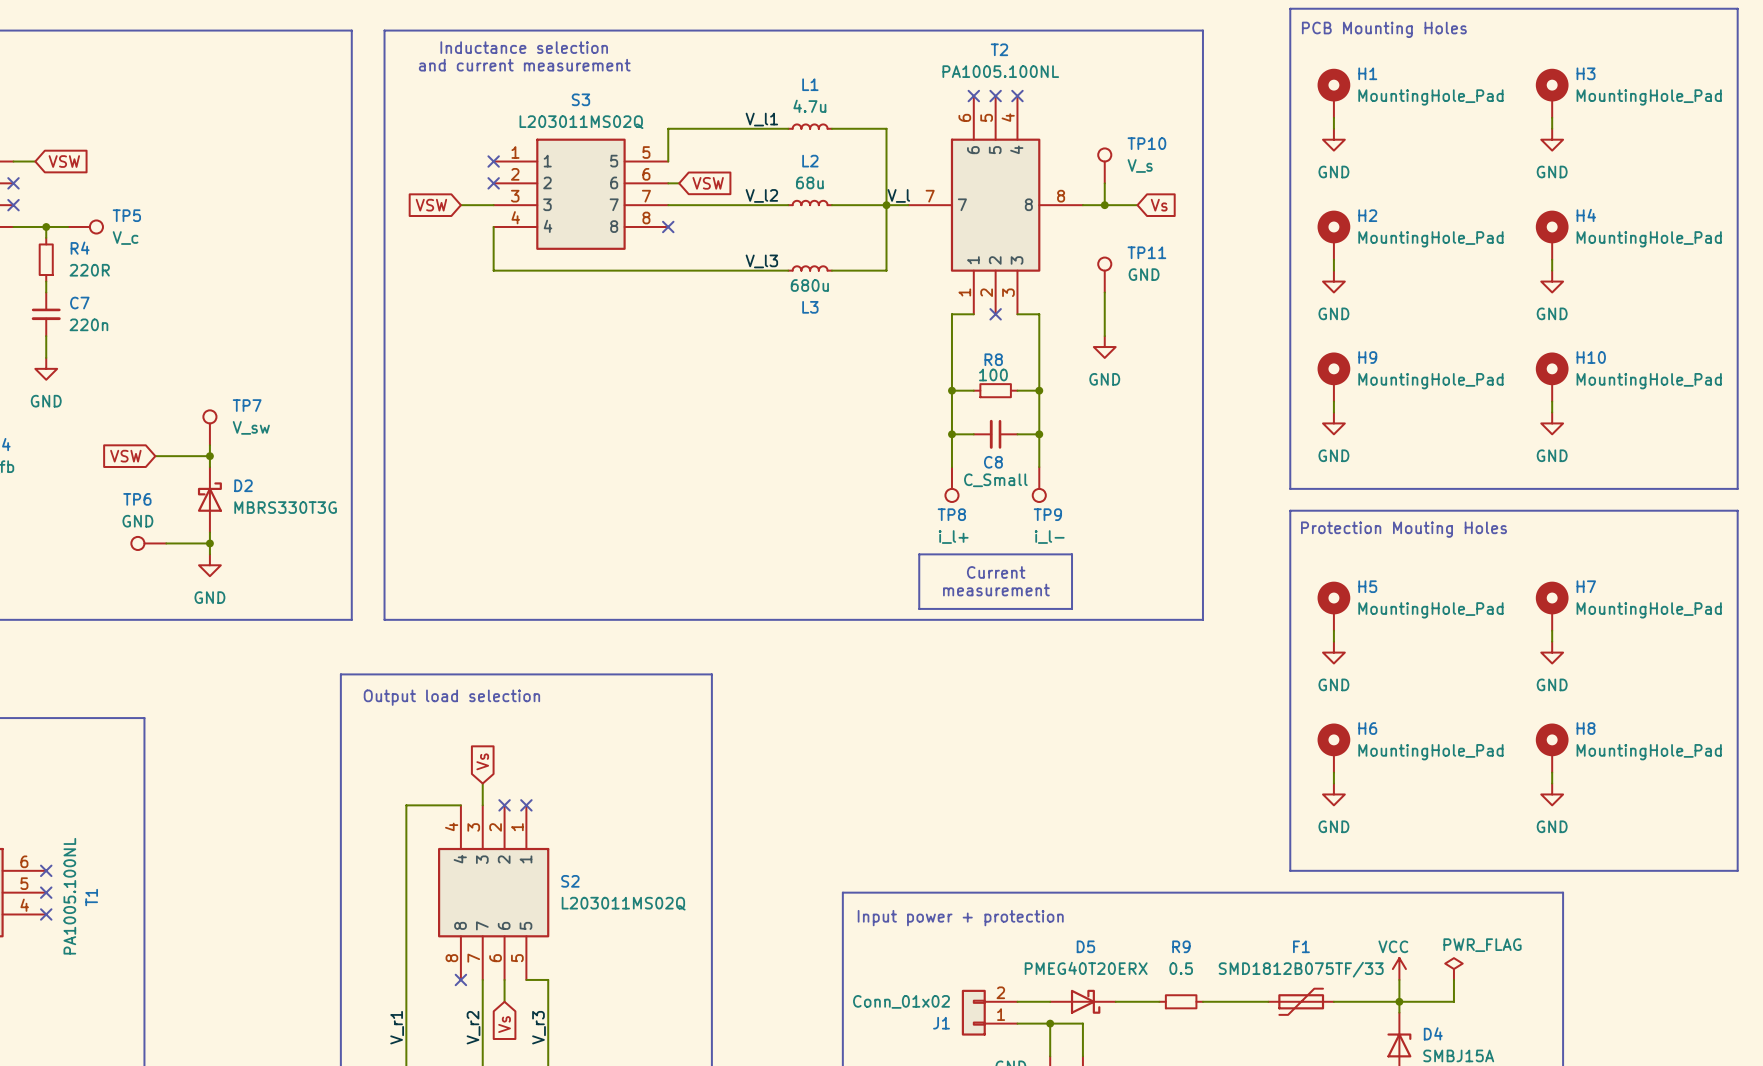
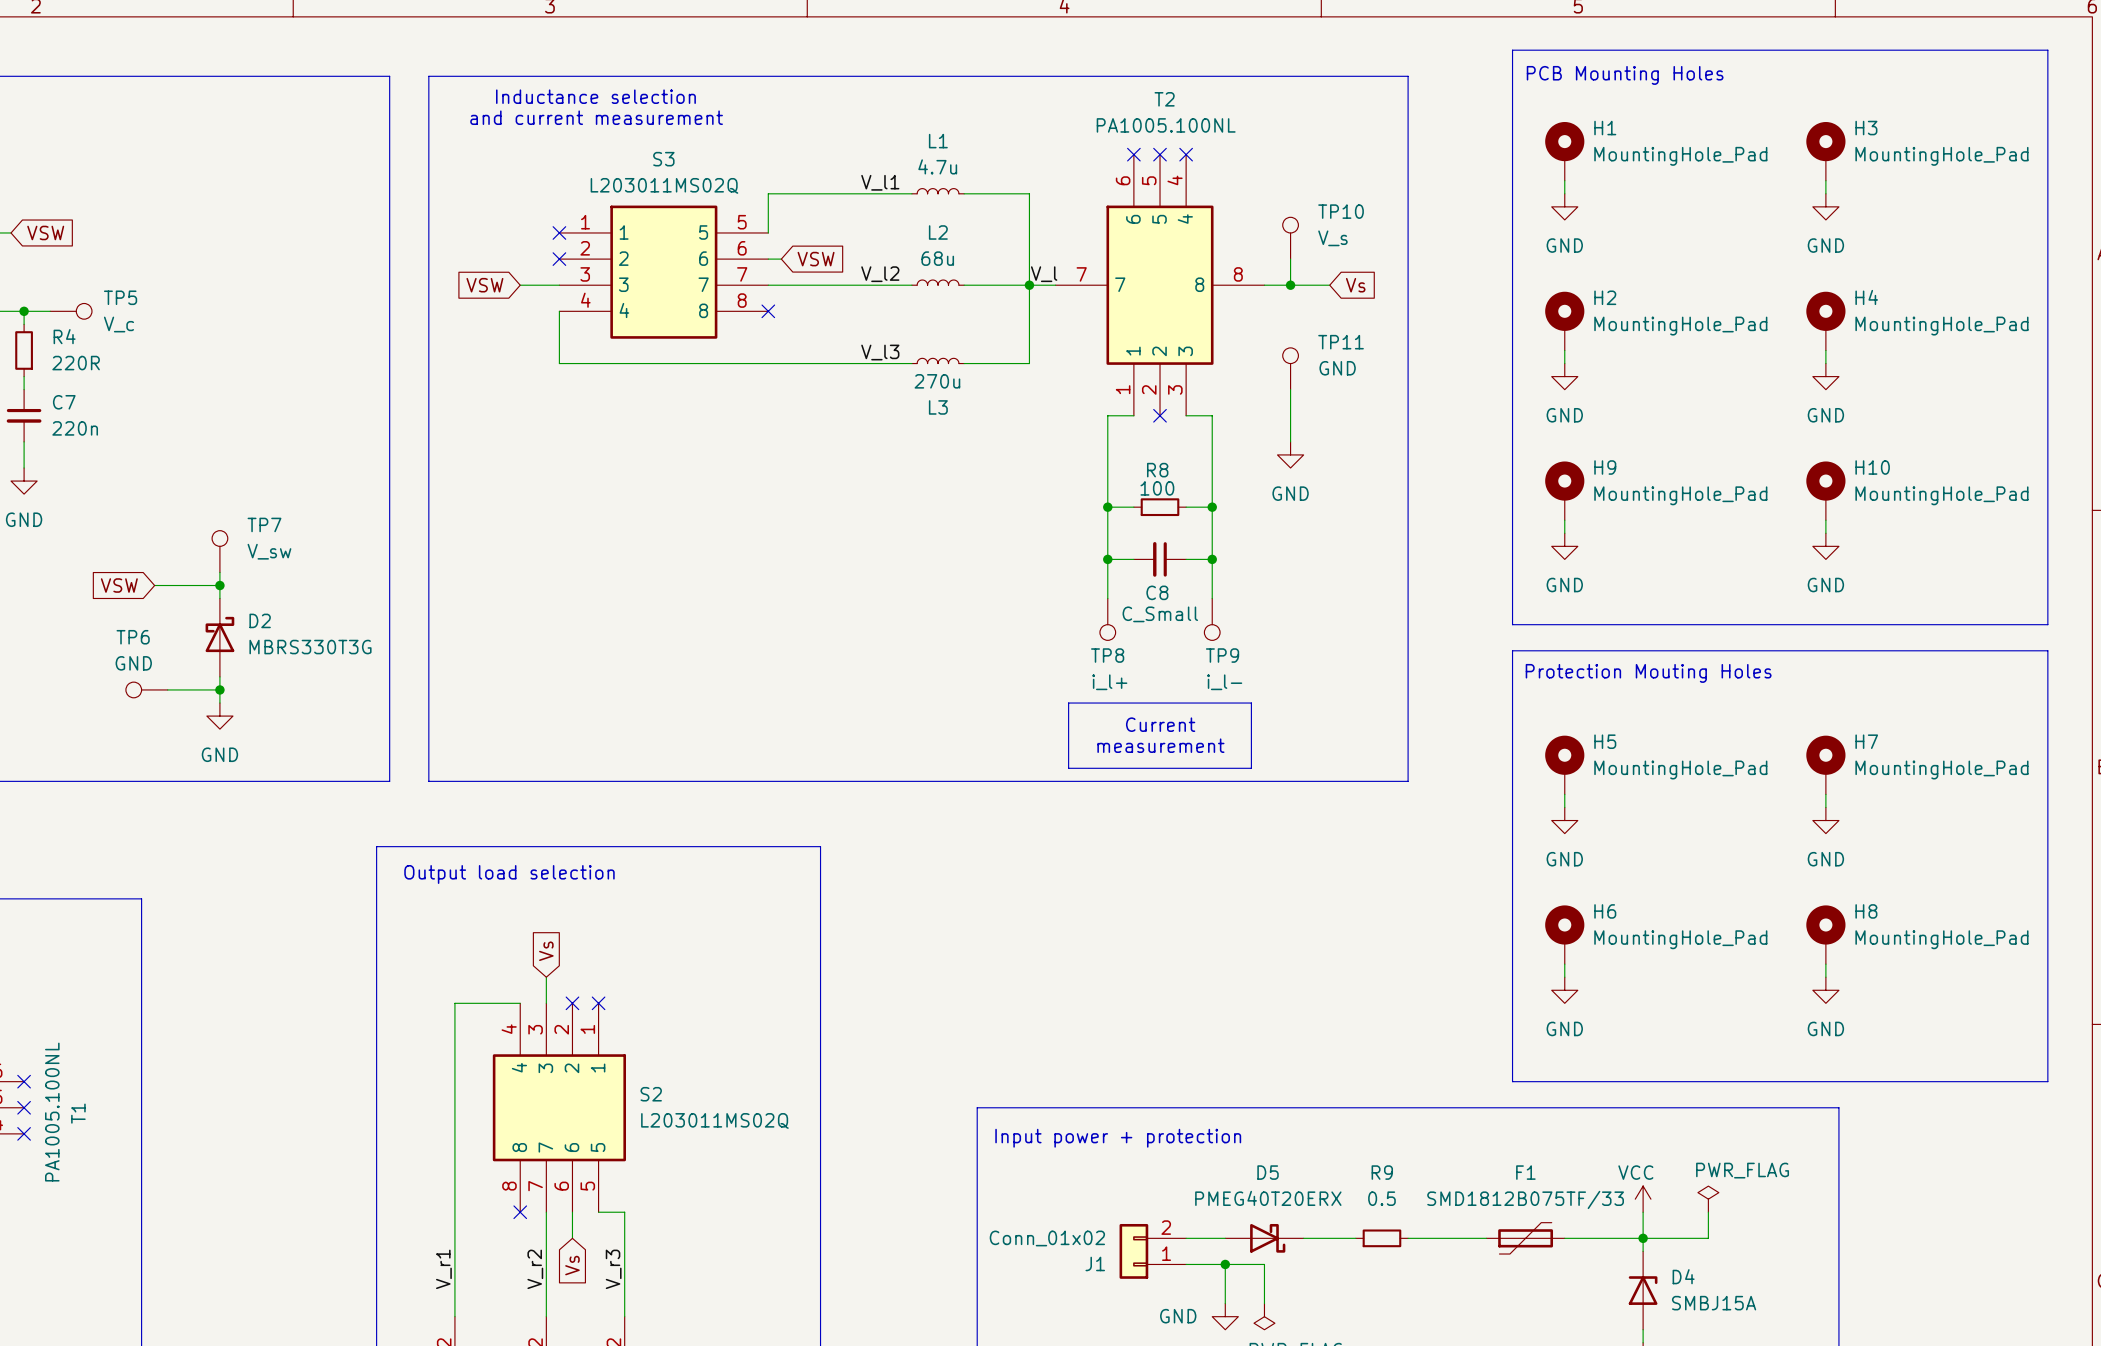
L3 value: 680u (809, 285) -> 270u (937, 381)

